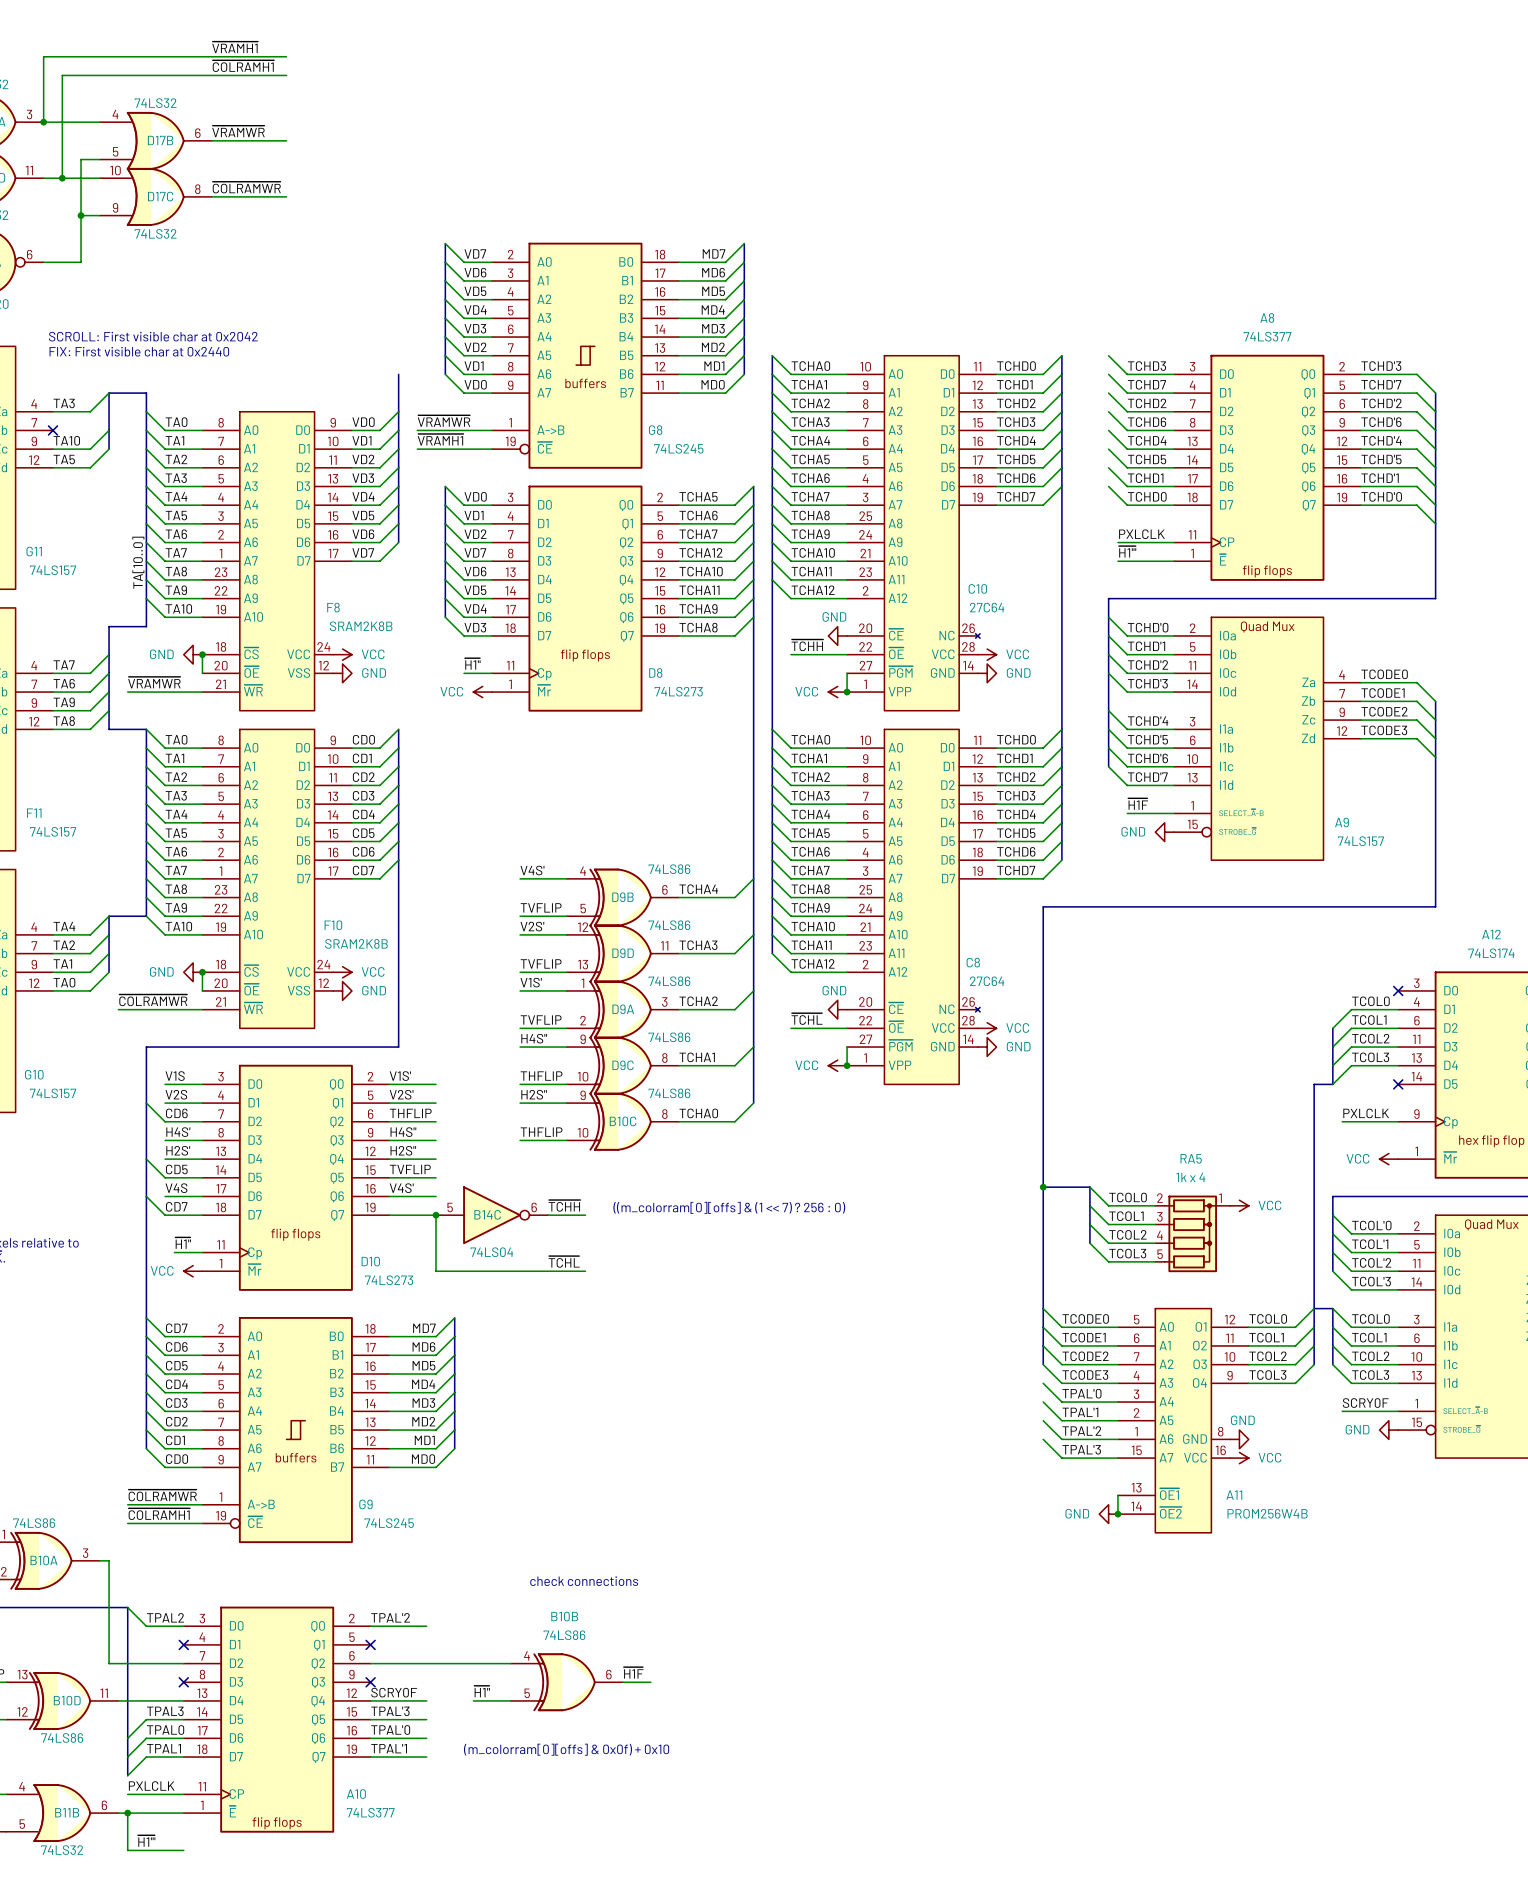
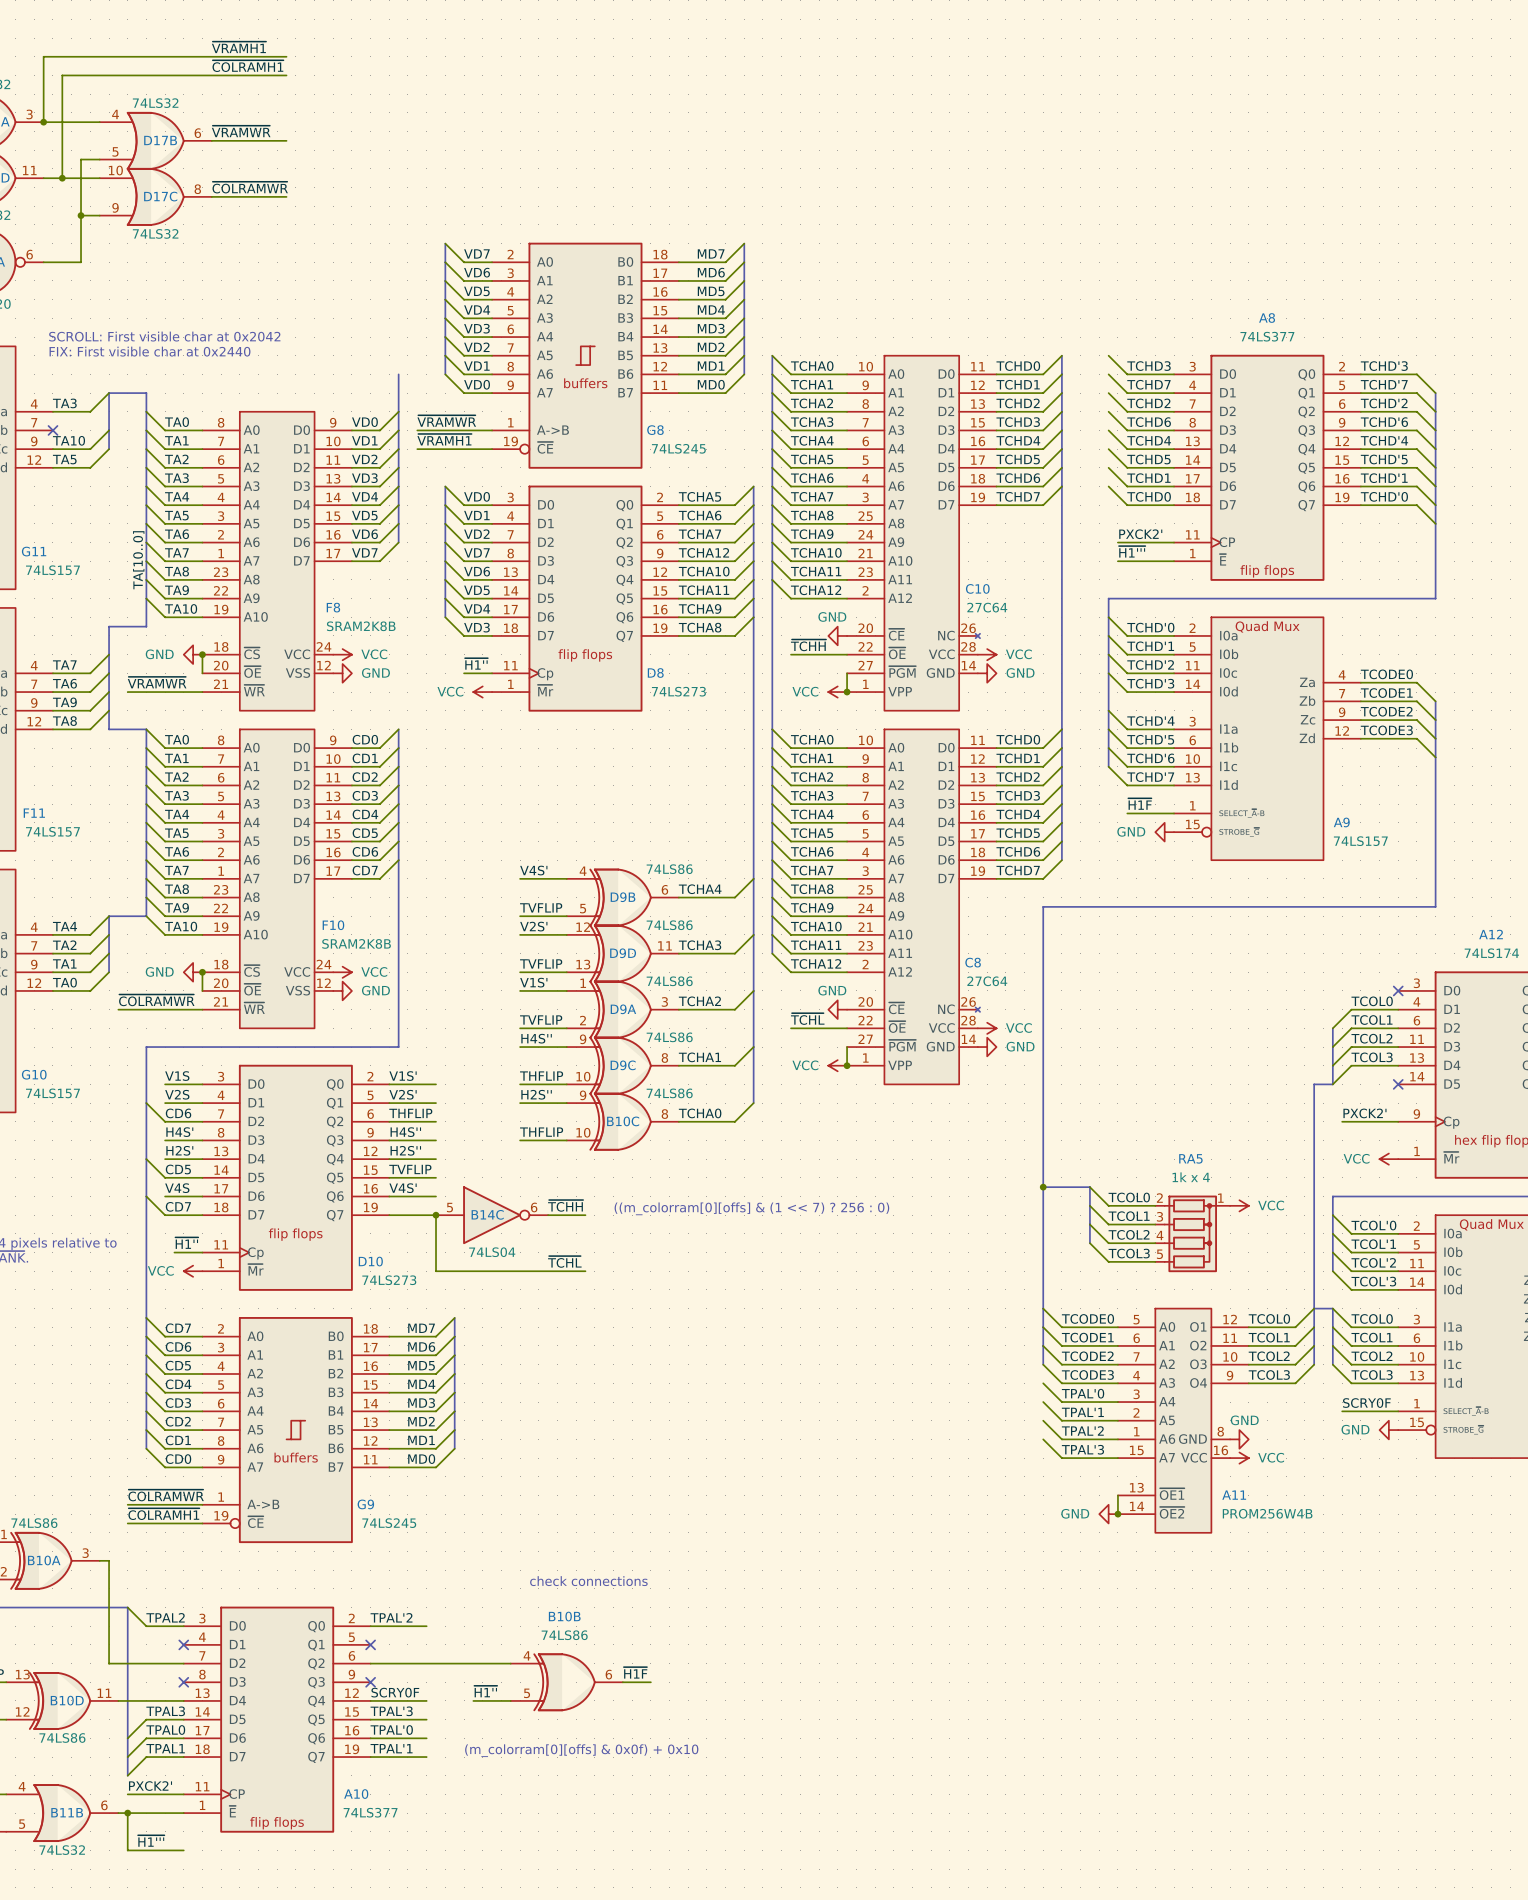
label: PXLCLK (1141, 534) -> PXCK2' (1140, 534)
label: PXLCLK (1366, 1113) -> PXCK2' (1364, 1113)
label: PXLCLK (151, 1786) -> PXCK2' (150, 1786)

